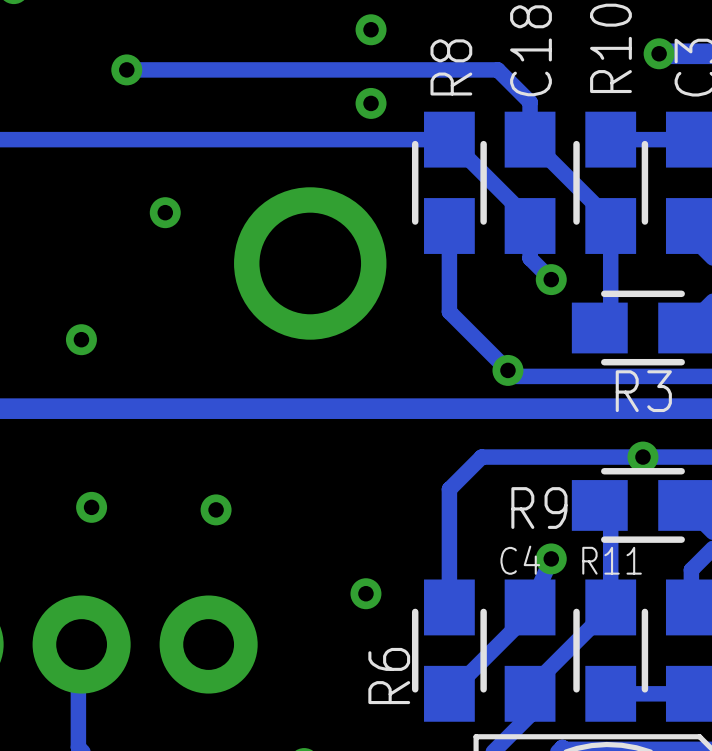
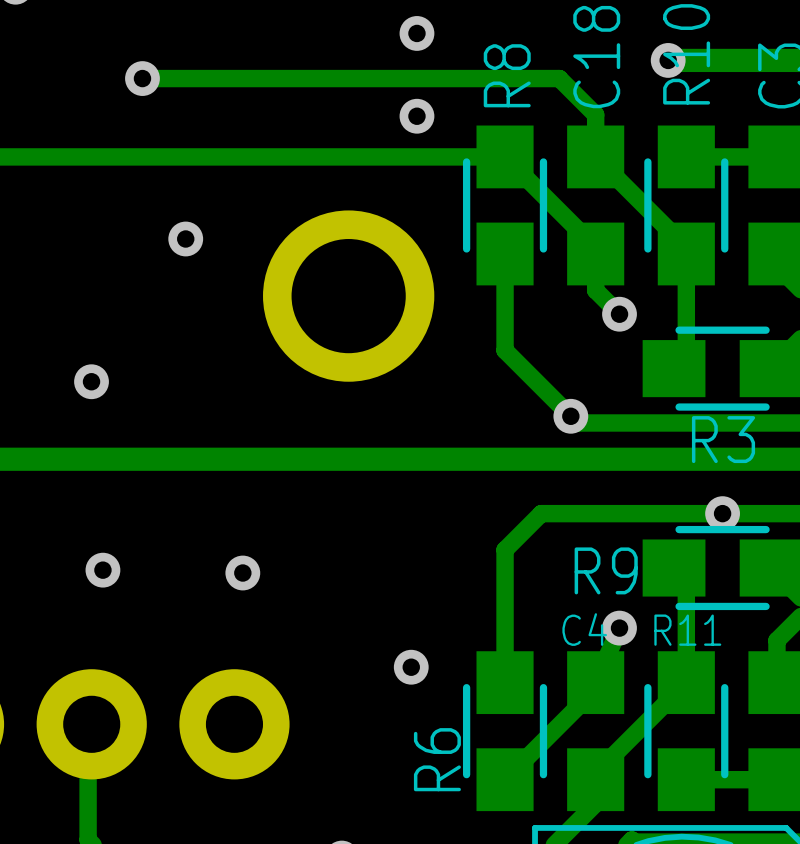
track: none -> (740, 60) (668, 60)
via position: (659, 53) -> (668, 60)

